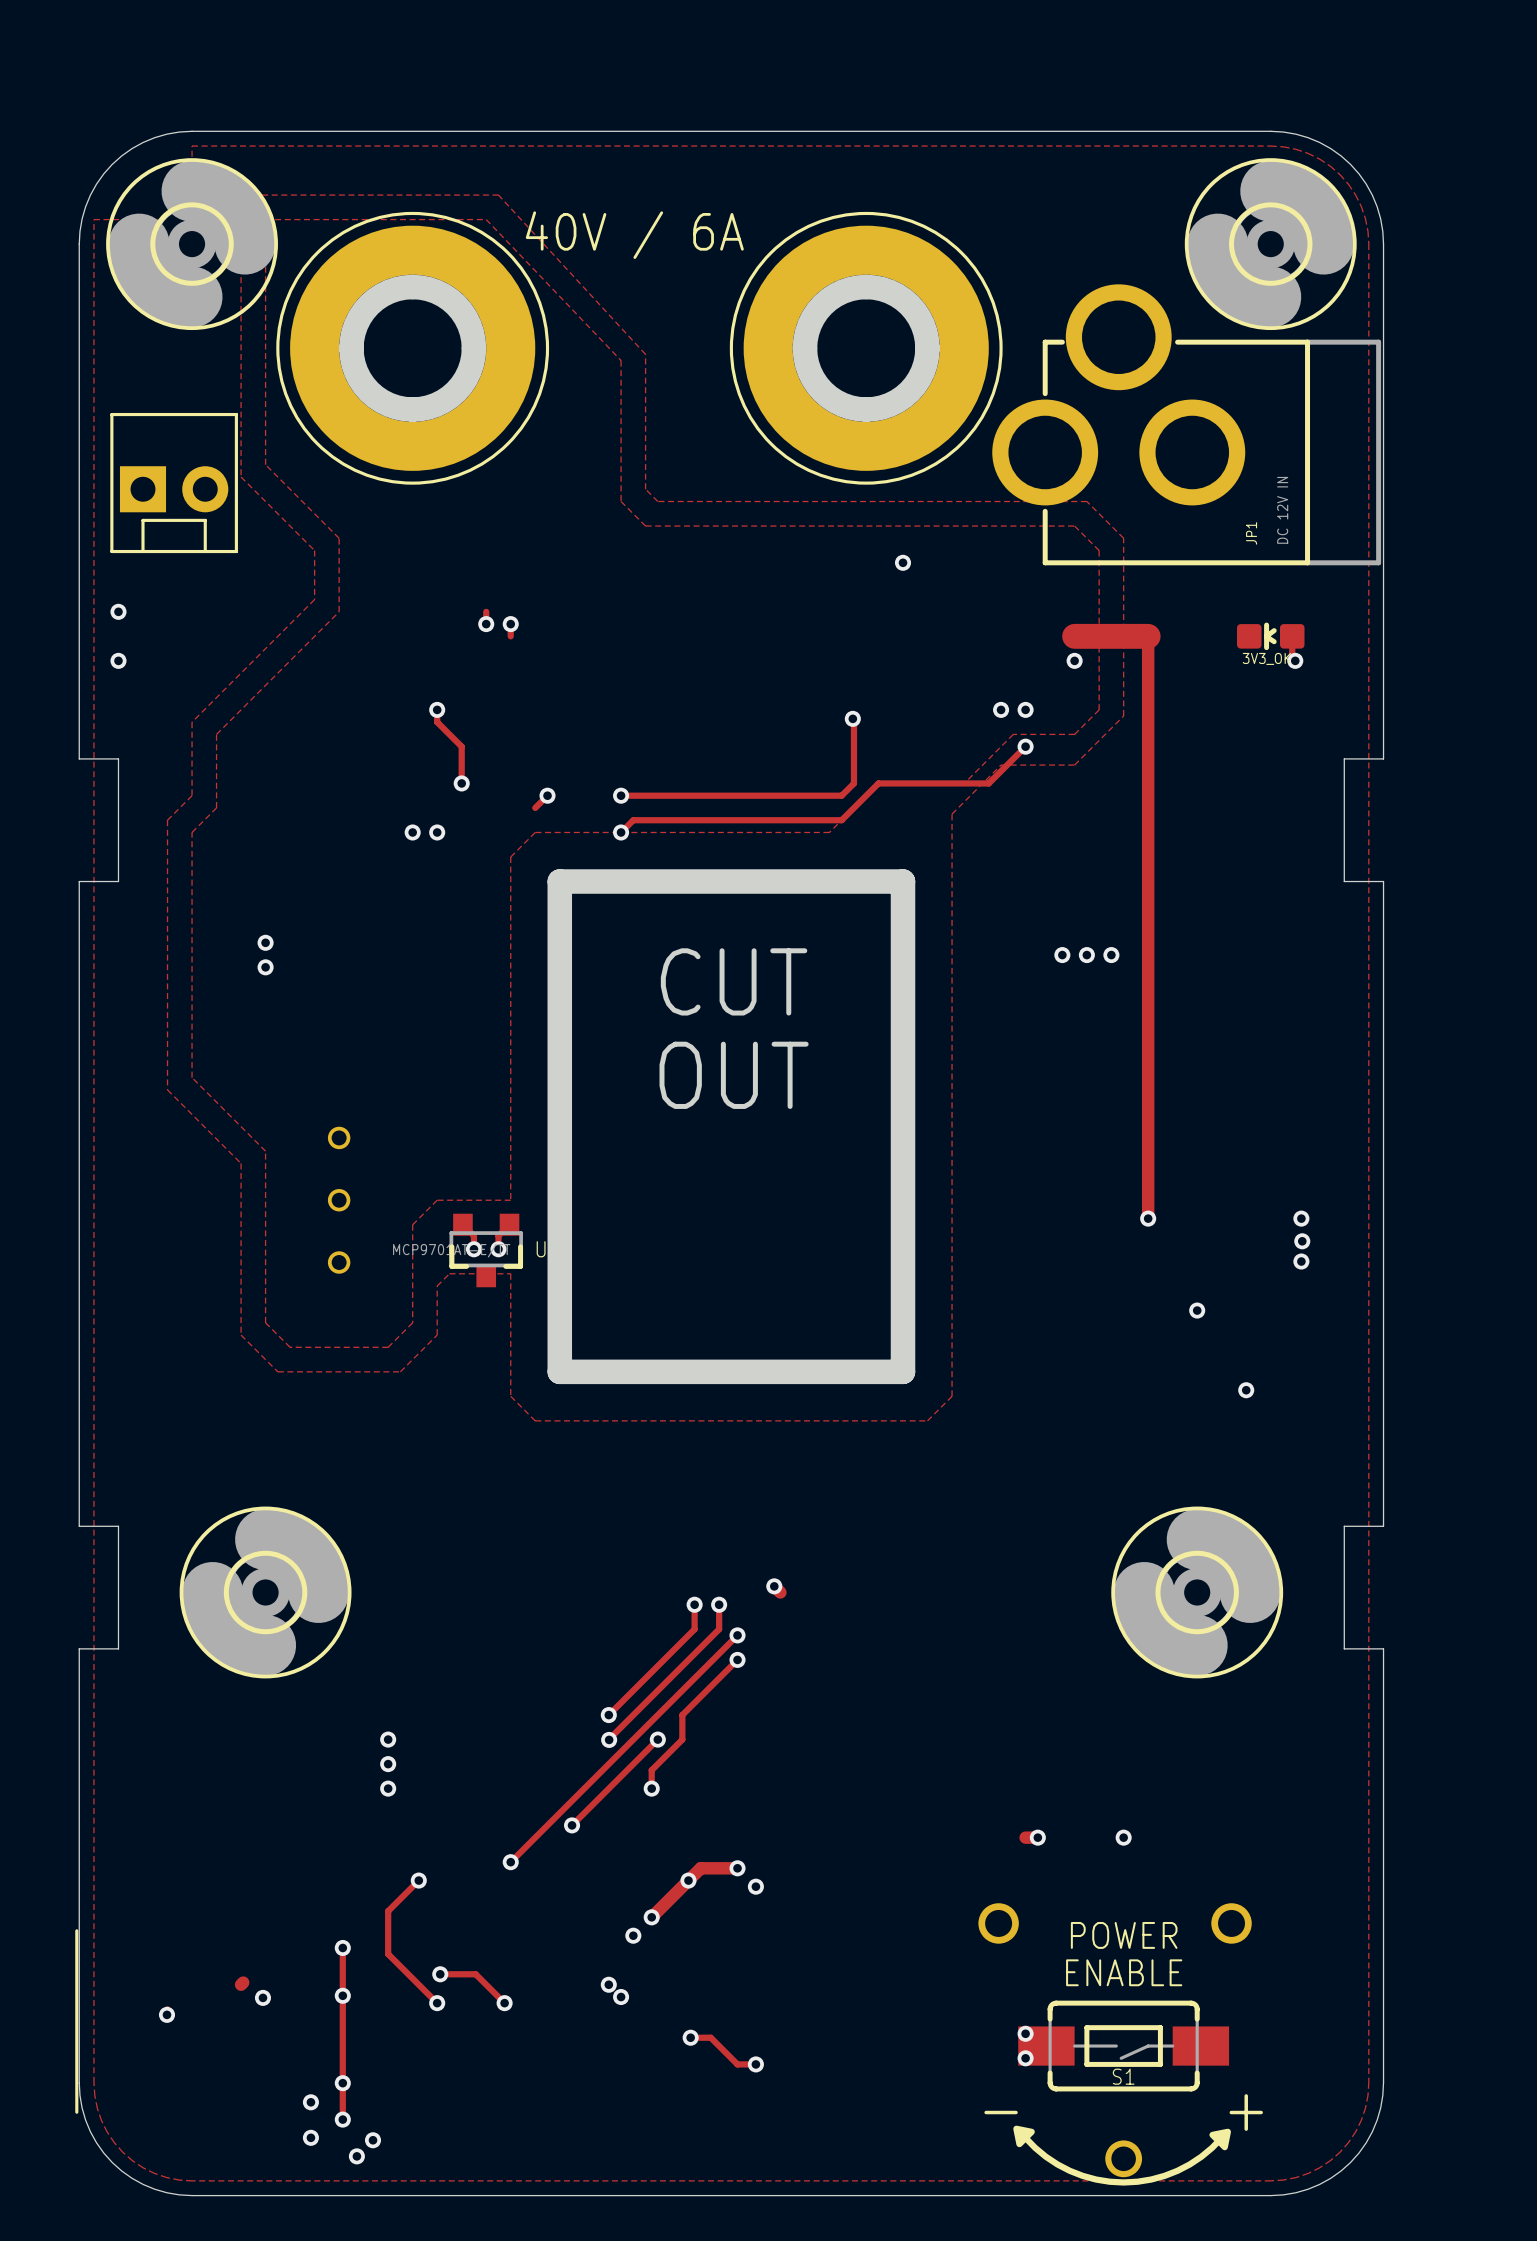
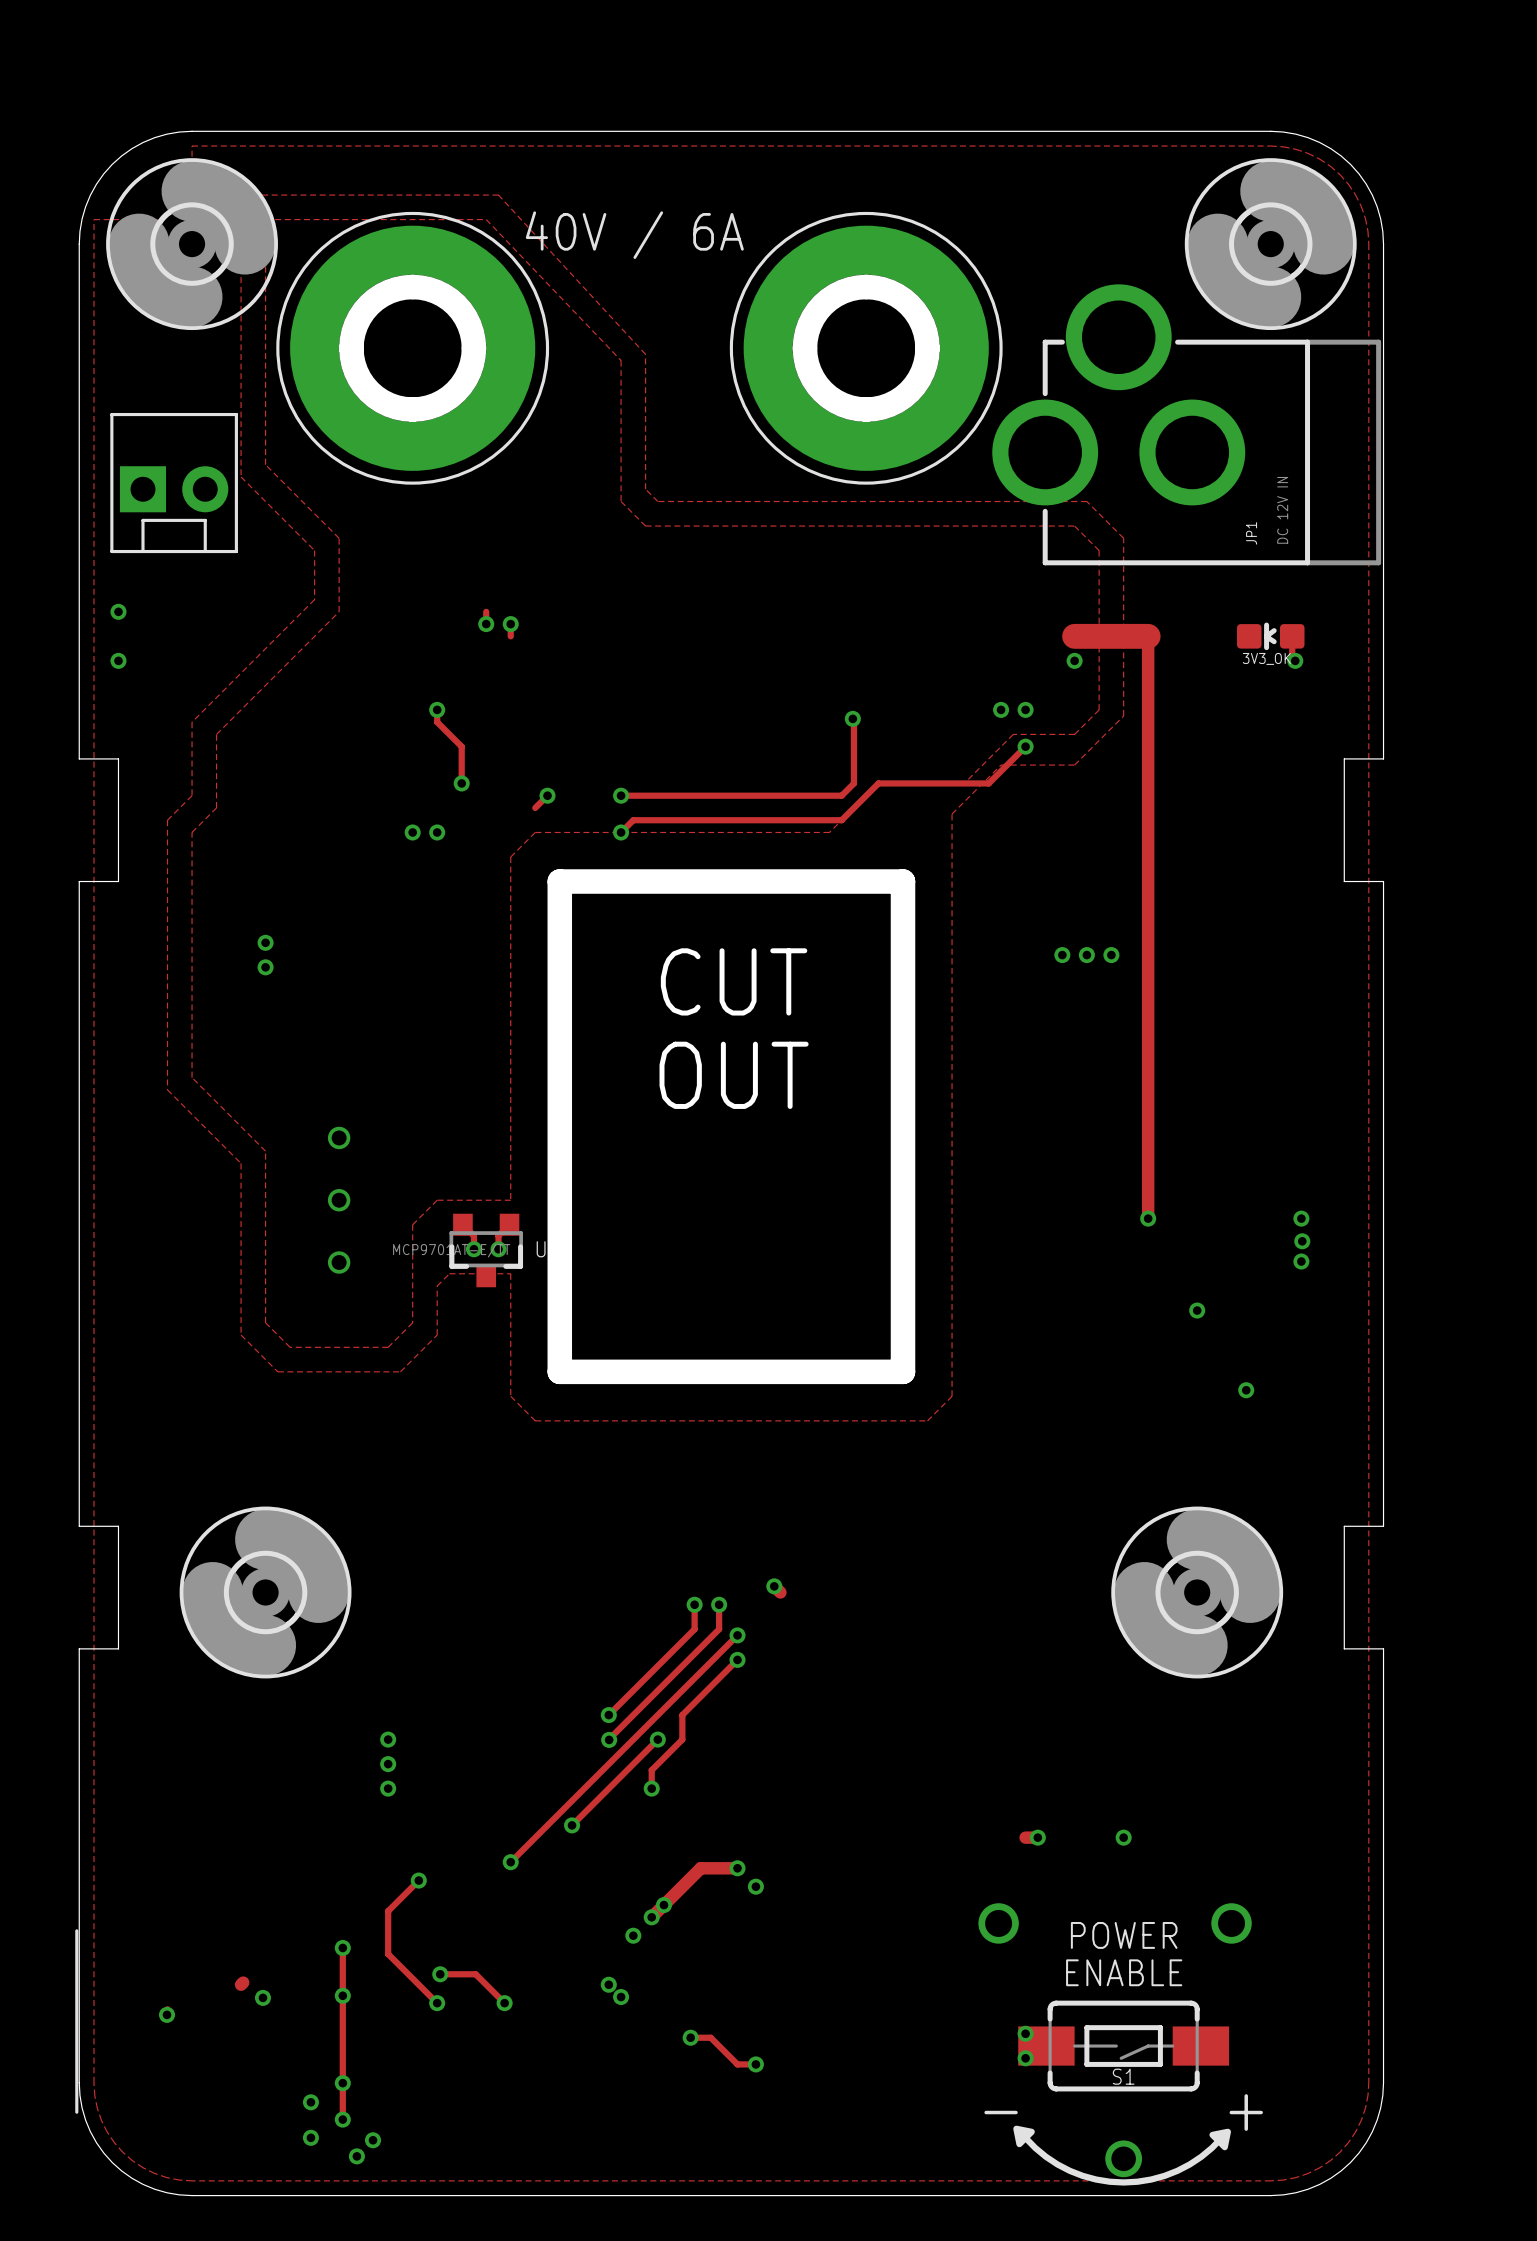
via: (903, 562) -> none
via position: (688, 1880) -> (663, 1905)

